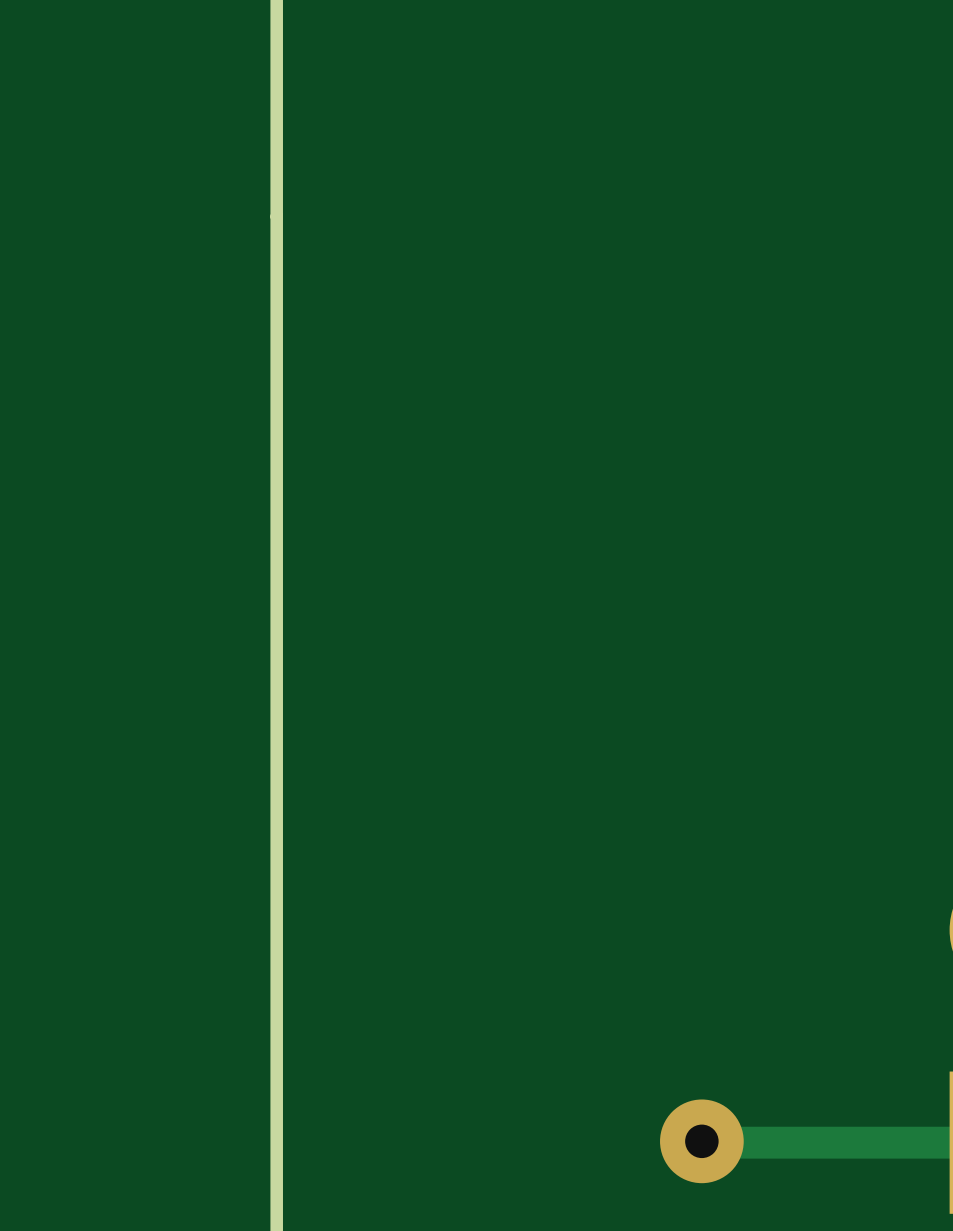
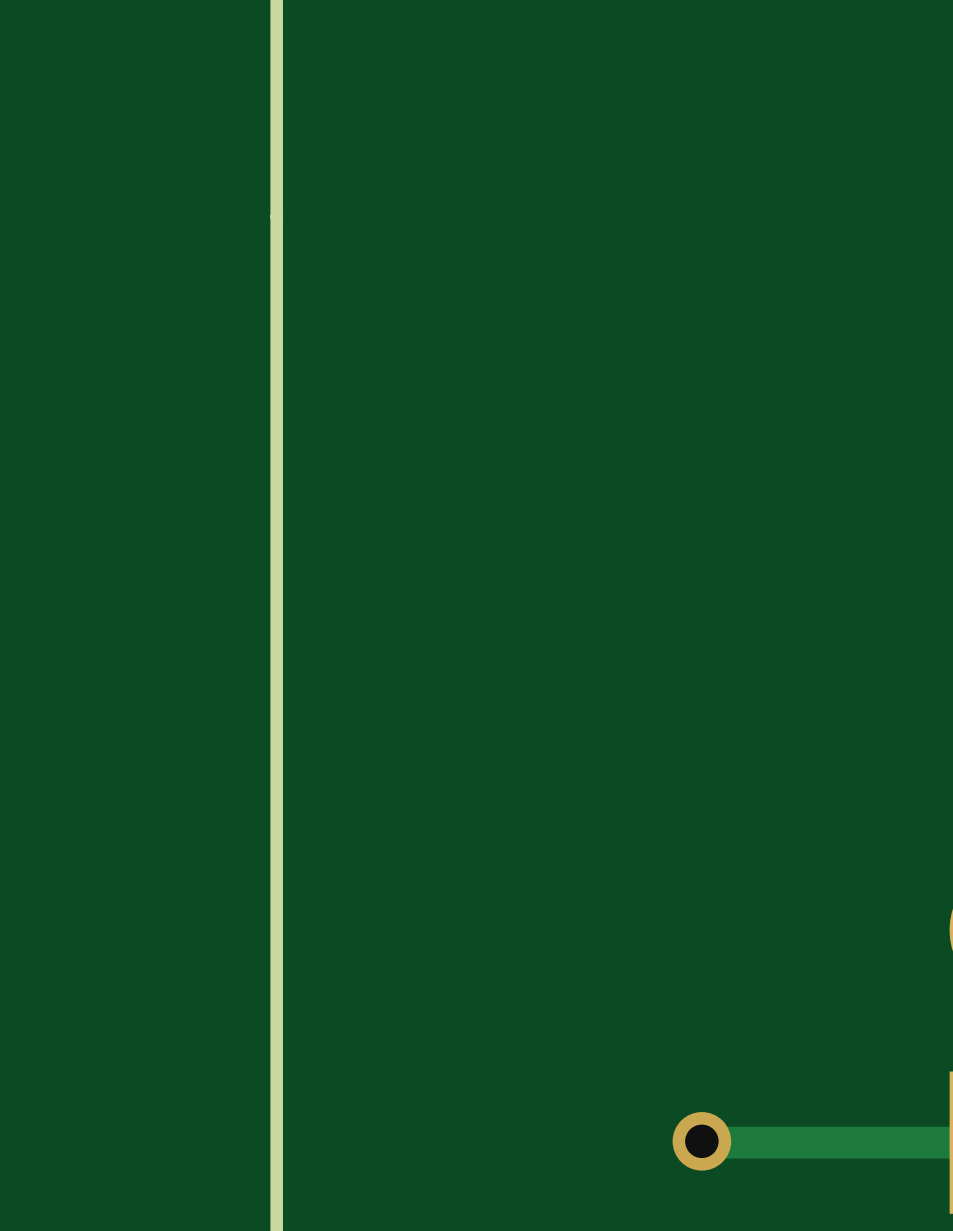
via size: [660, 1099, 744, 1184] -> [672, 1112, 732, 1171]

